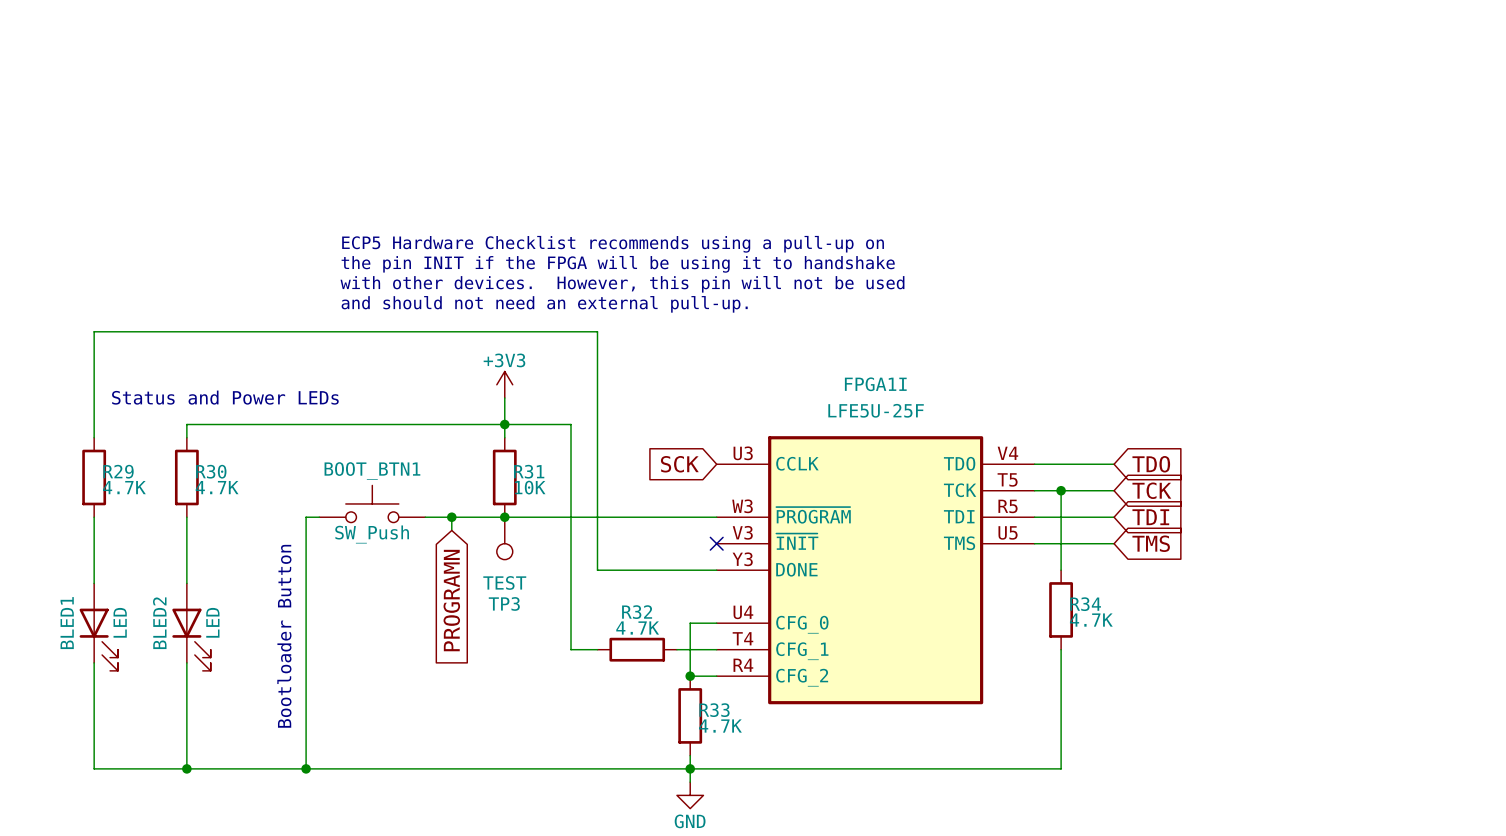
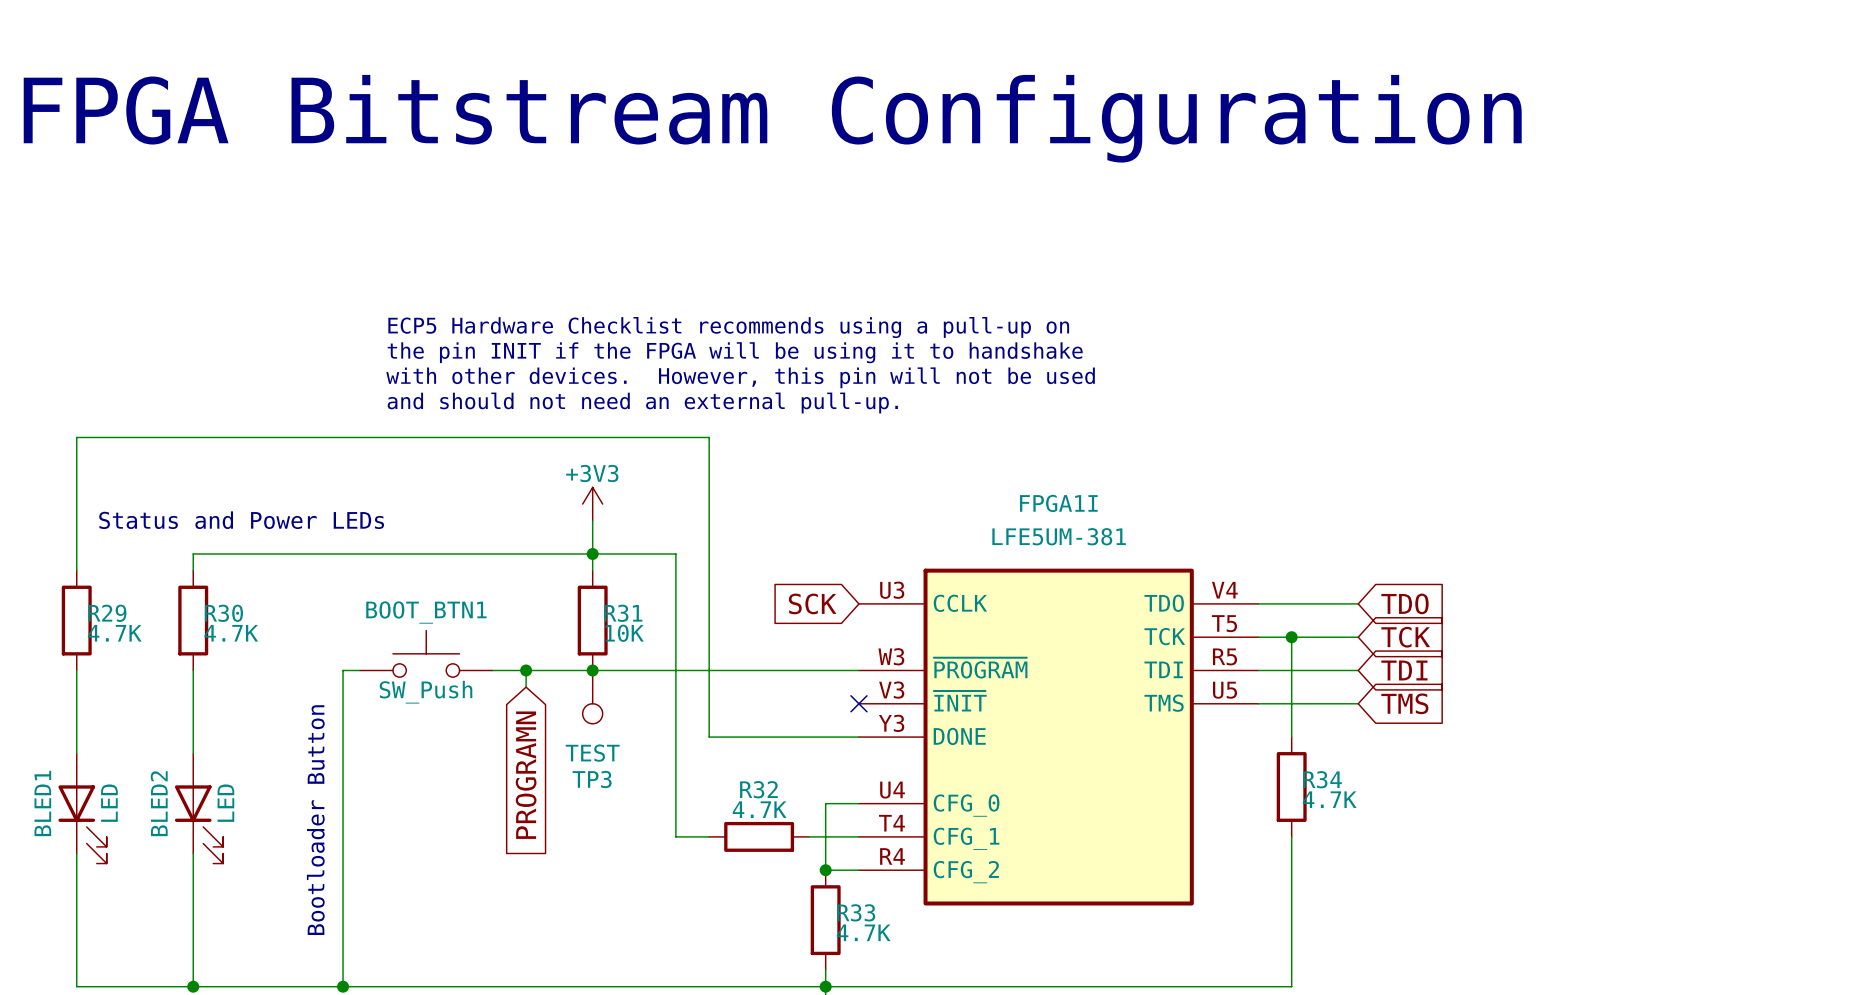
text: none -> FPGA Bitstream Configuration (772, 118)
FPGA1I value: LFE5U-25F (876, 410) -> LFE5UM-381 (1059, 536)

